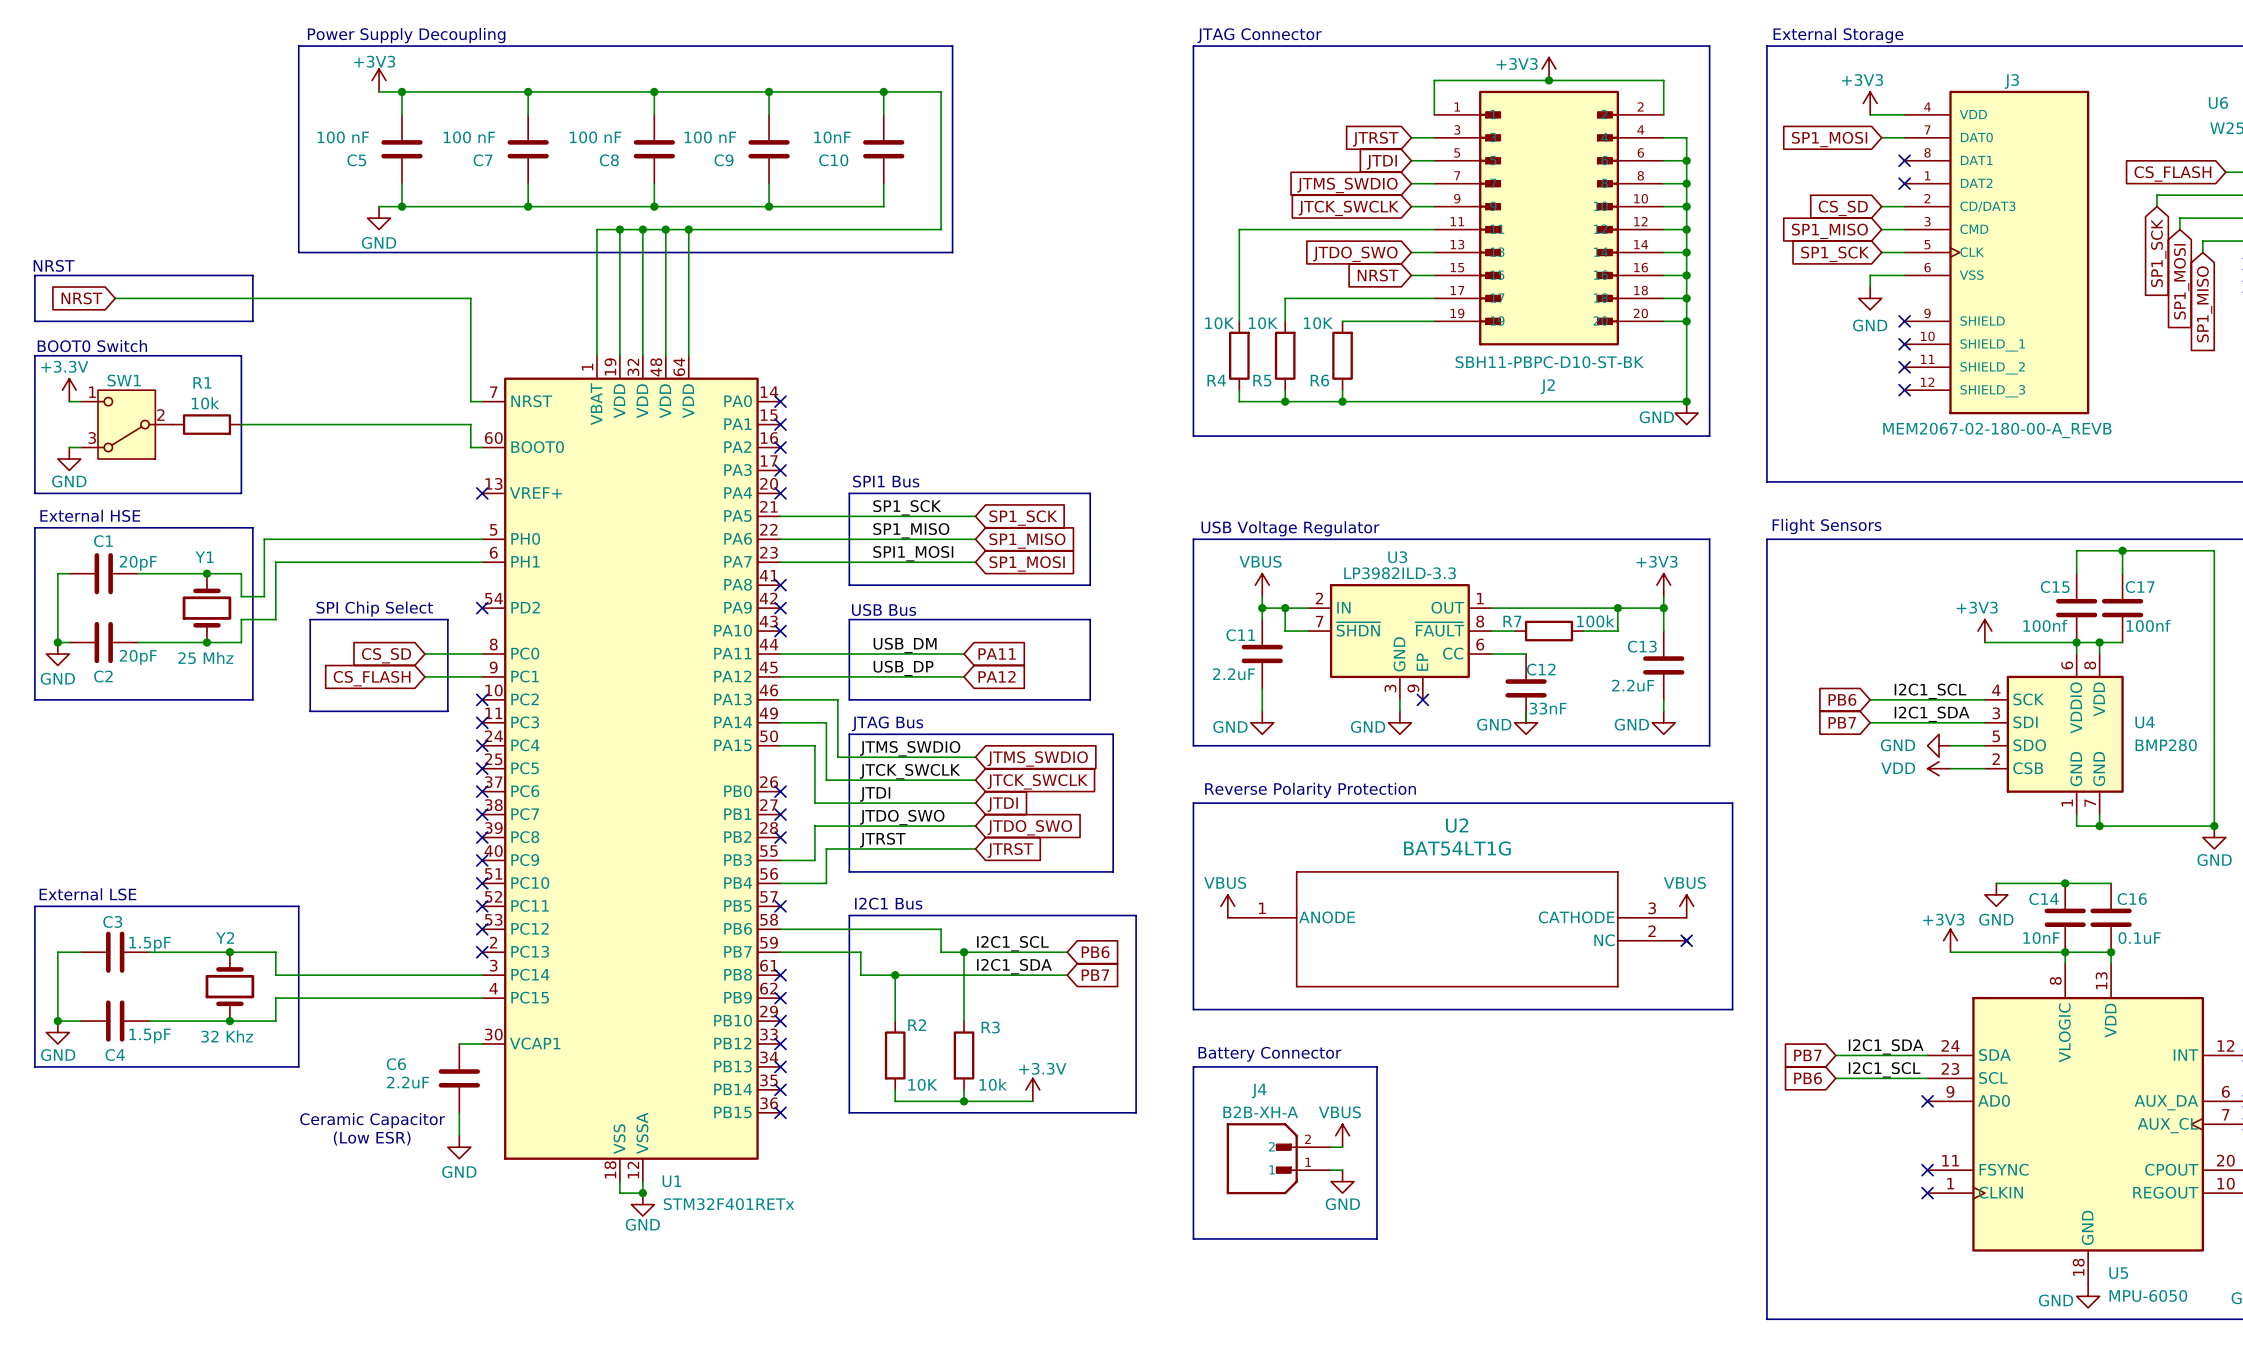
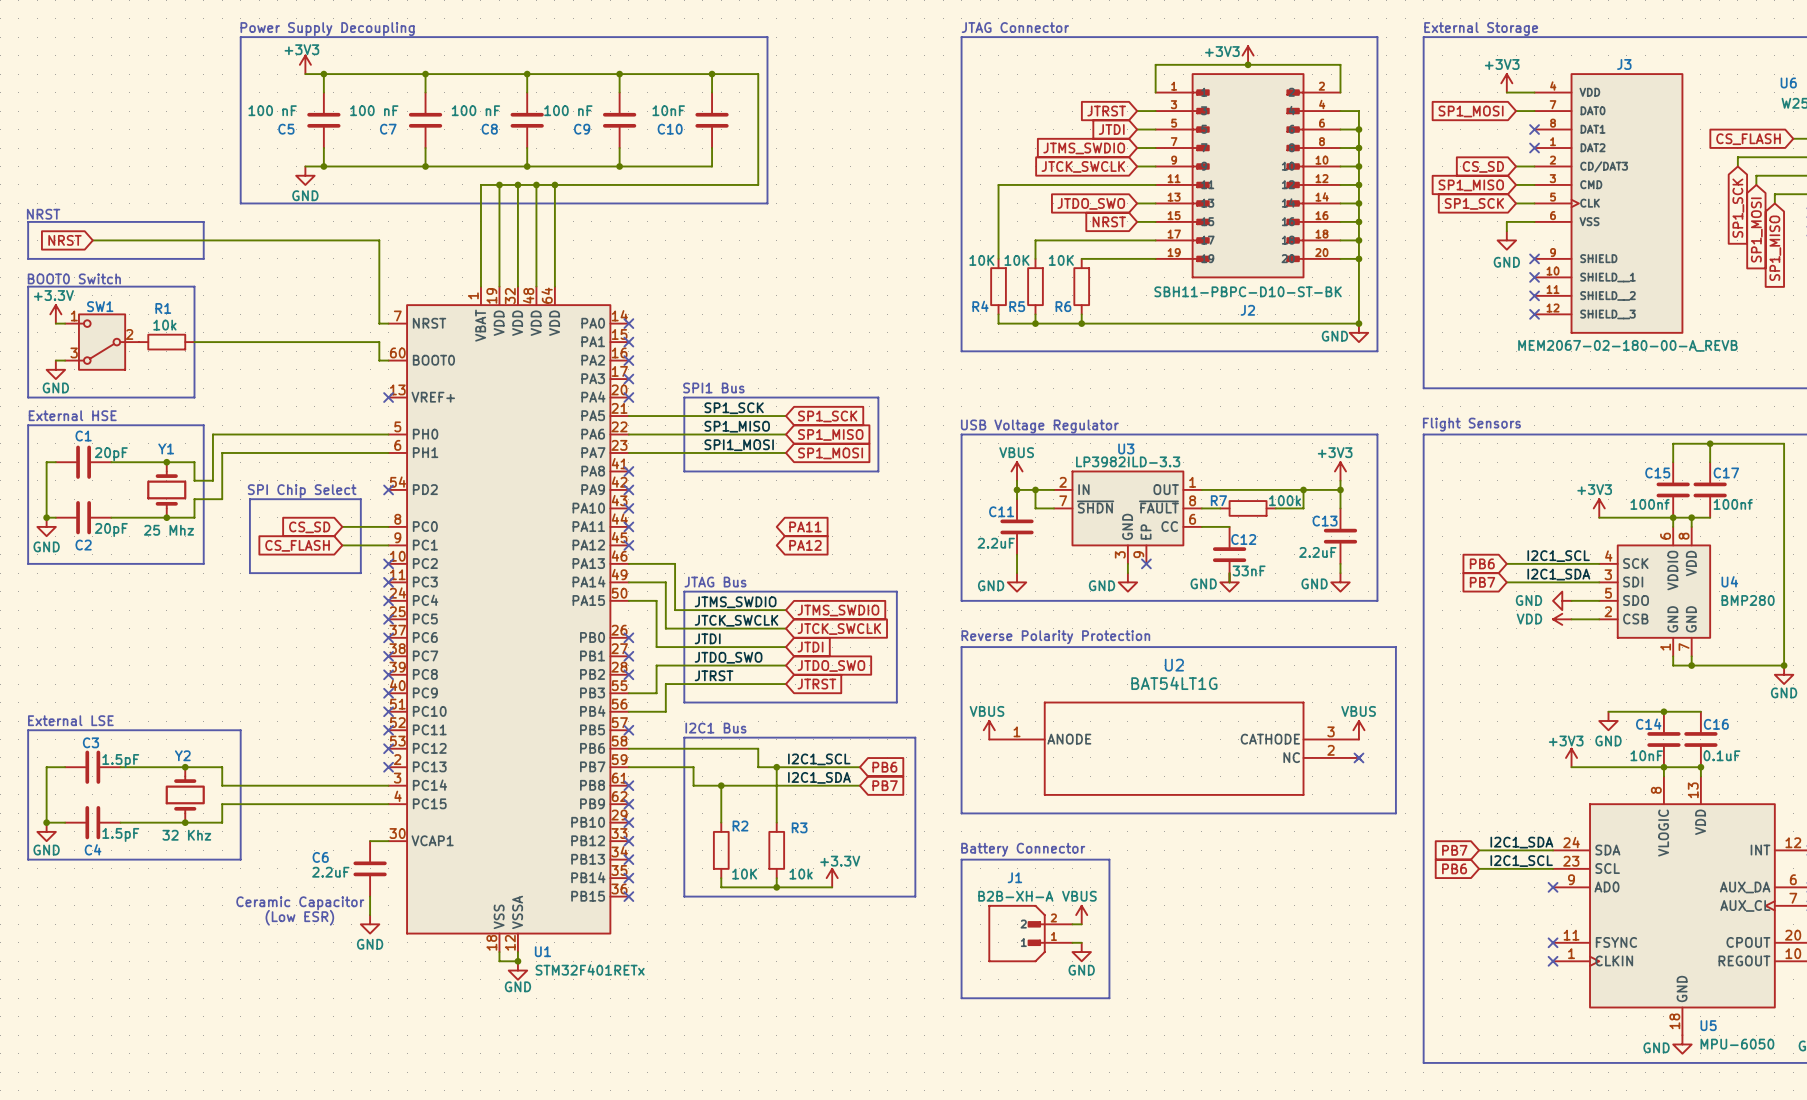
text: USB Bus (884, 610) -> none
line: (849, 619) (1090, 619) (1090, 699) (849, 699) (849, 619) -> none
label: USB_DM (905, 645) -> none
wire: (780, 653) (964, 653) -> none
no-connect mark: none -> (628, 526)
label: USB_DP (903, 668) -> none
wire: (780, 676) (964, 676) -> none
no-connect mark: none -> (628, 545)
J4 name: J4 (1259, 1091) -> J1 (1014, 877)

